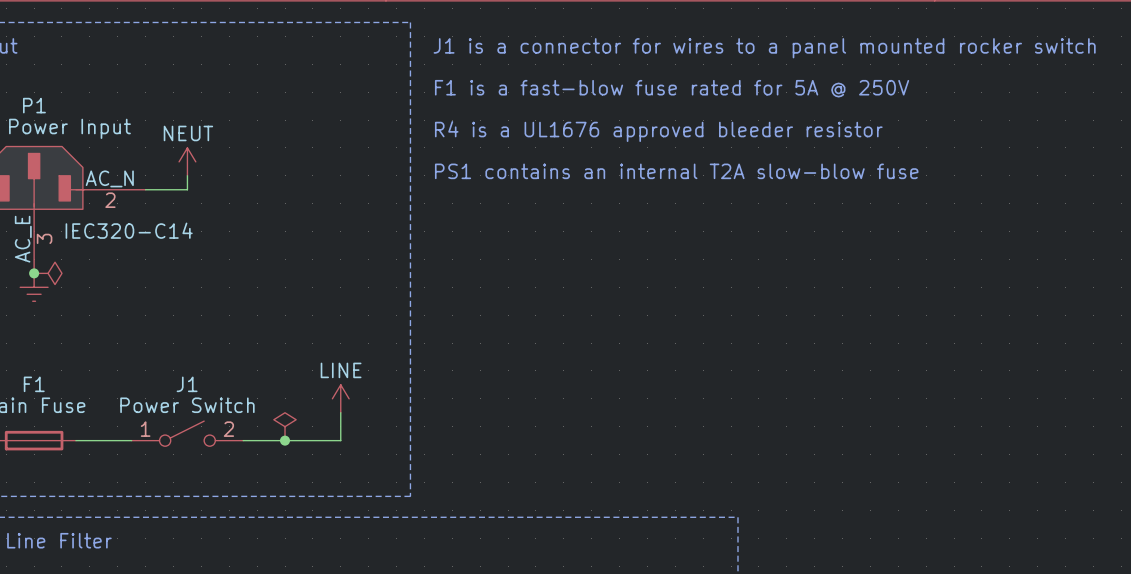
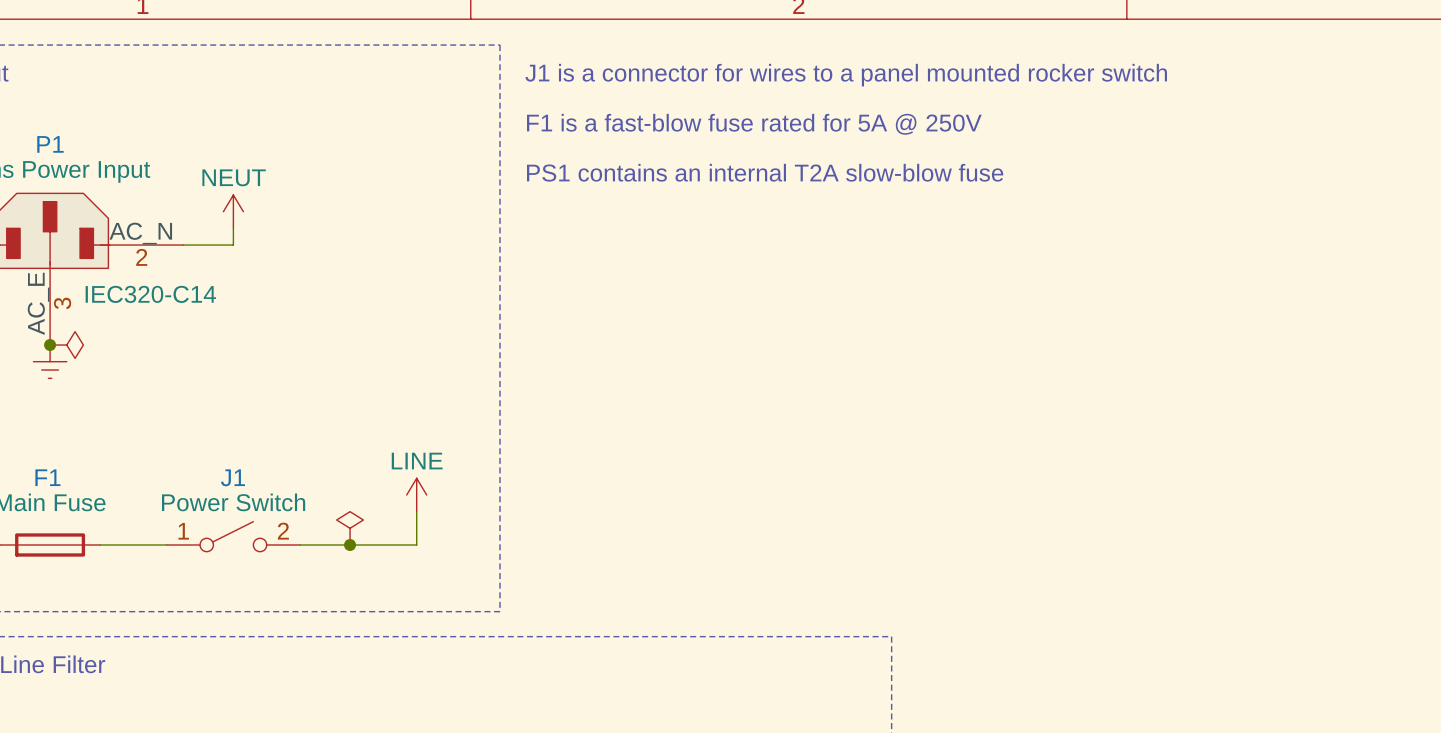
text: R4 is a UL1676 approved bleeder resistor (658, 131) -> PS1 contains an internal T2A slow-blow fuse (765, 172)
text: PS1 contains an internal T2A slow-blow fuse (676, 171) -> none

